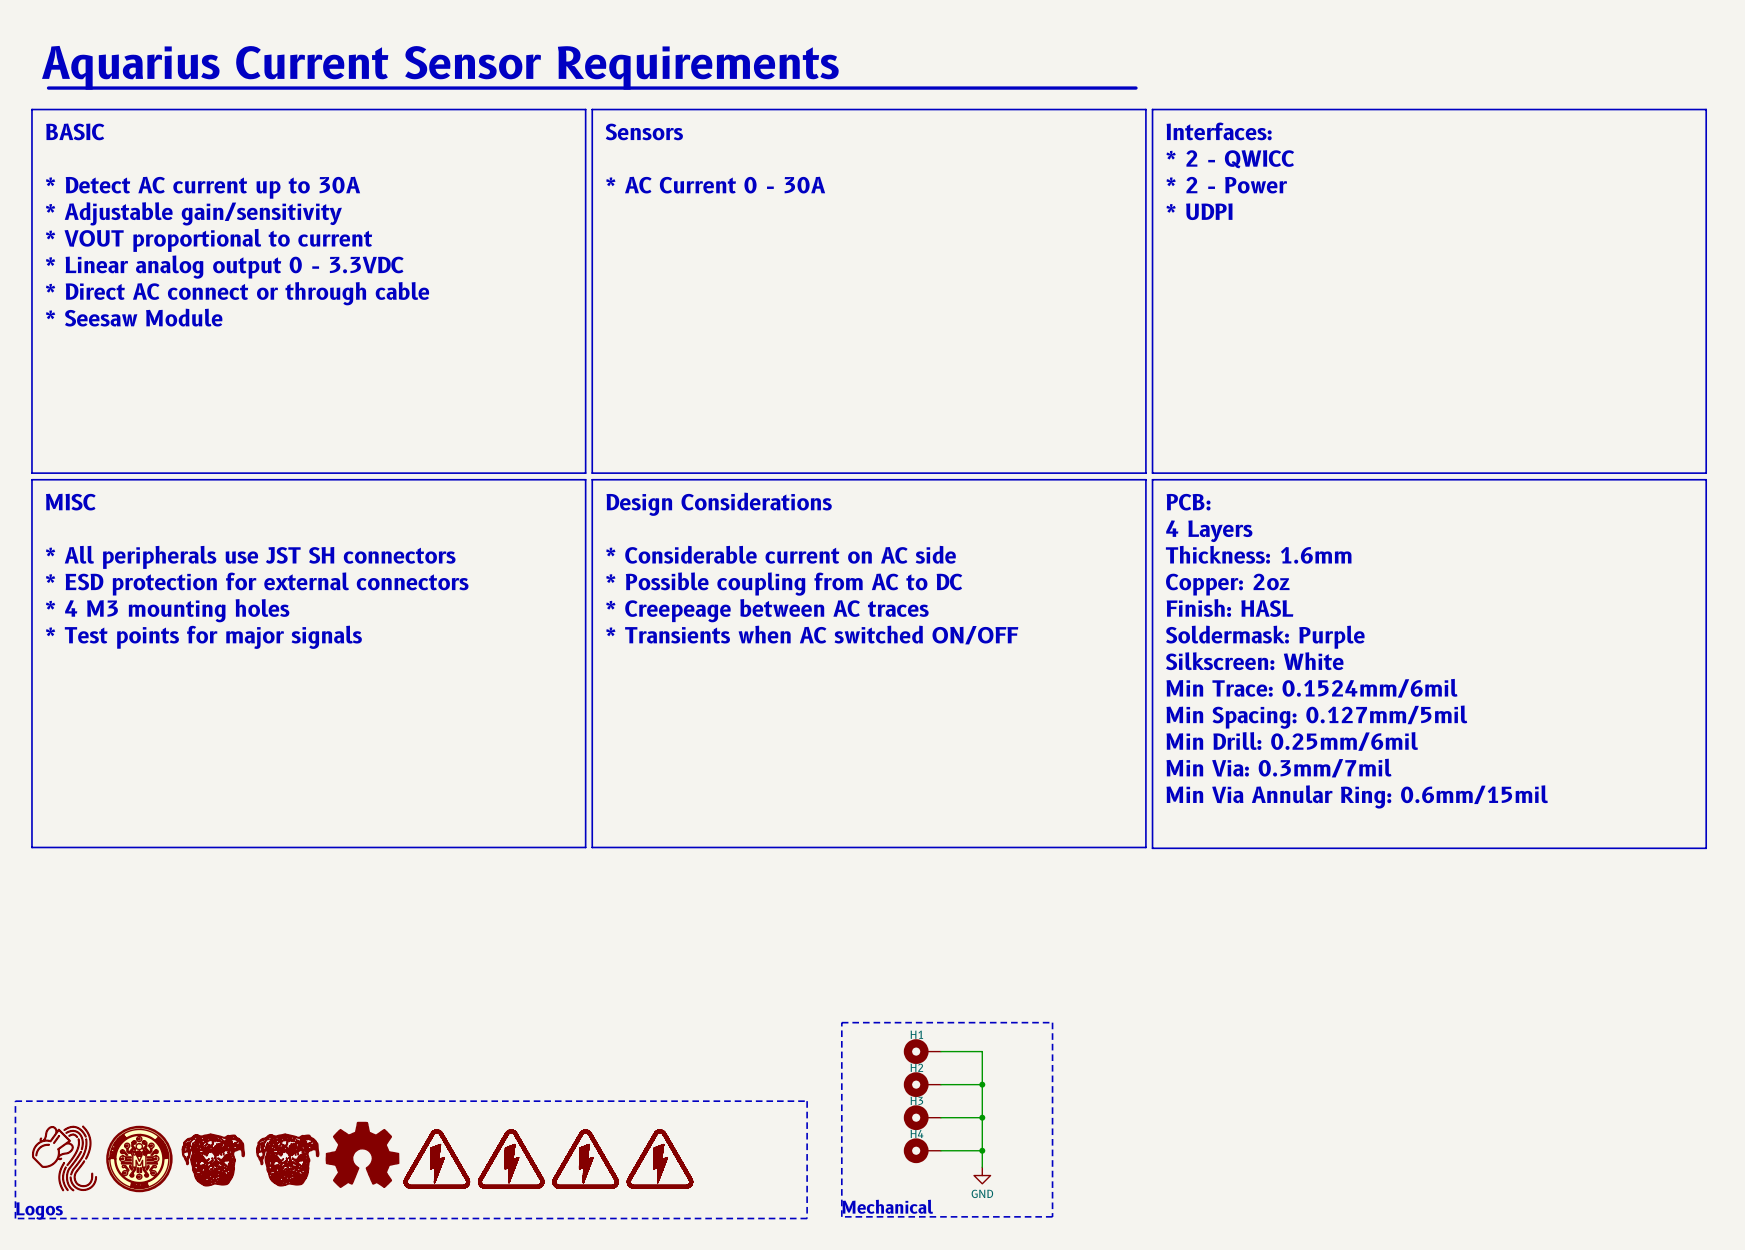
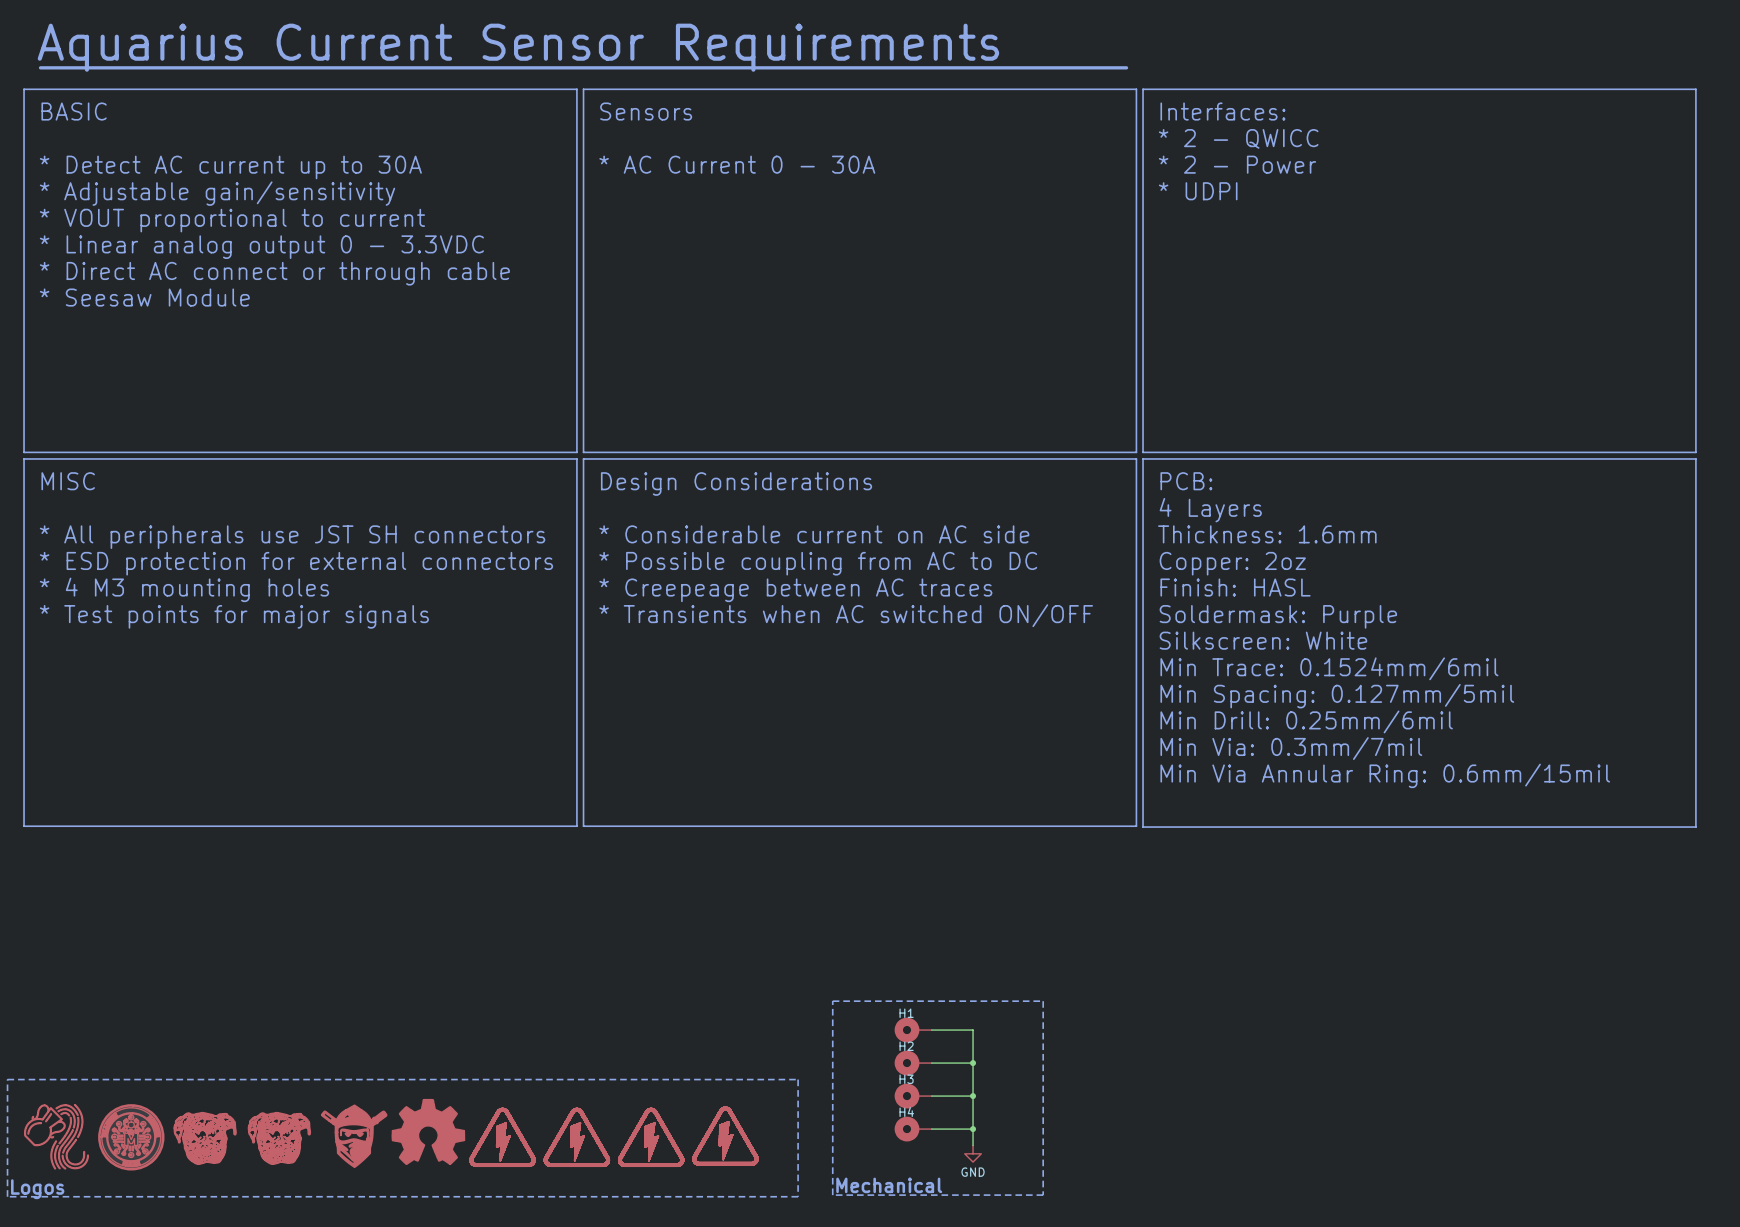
part symbol: [326, 1122, 399, 1188] -> [321, 1105, 387, 1168]
part symbol: [404, 1130, 470, 1189] -> [392, 1099, 465, 1165]
part: none -> (725, 1136)

